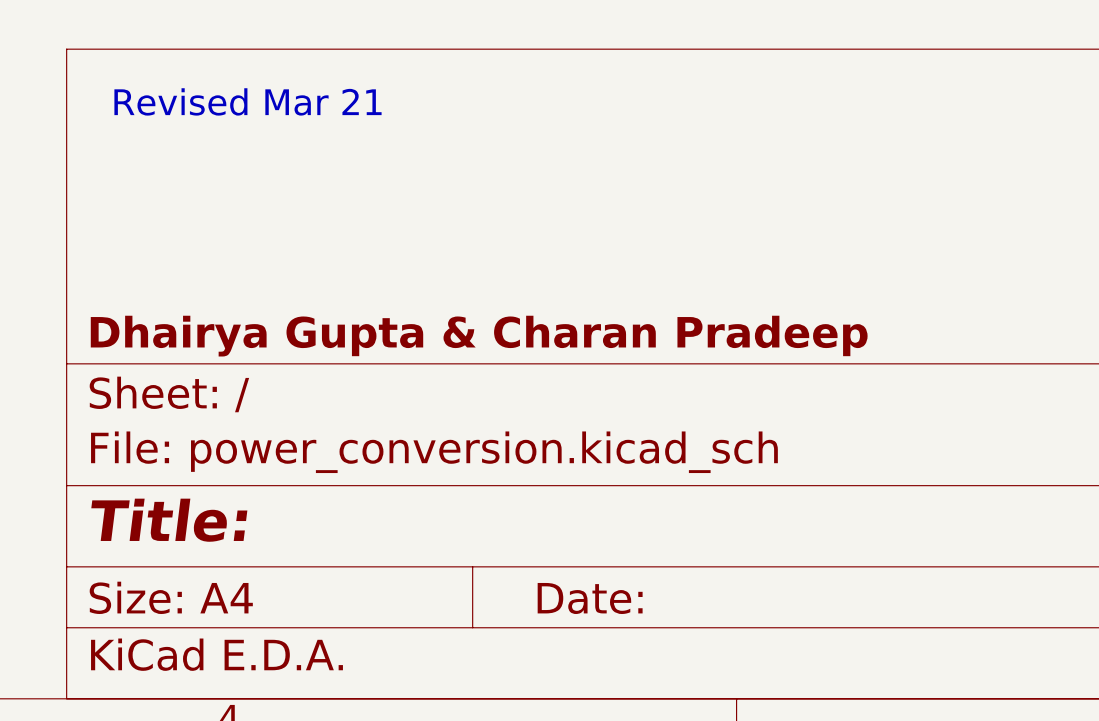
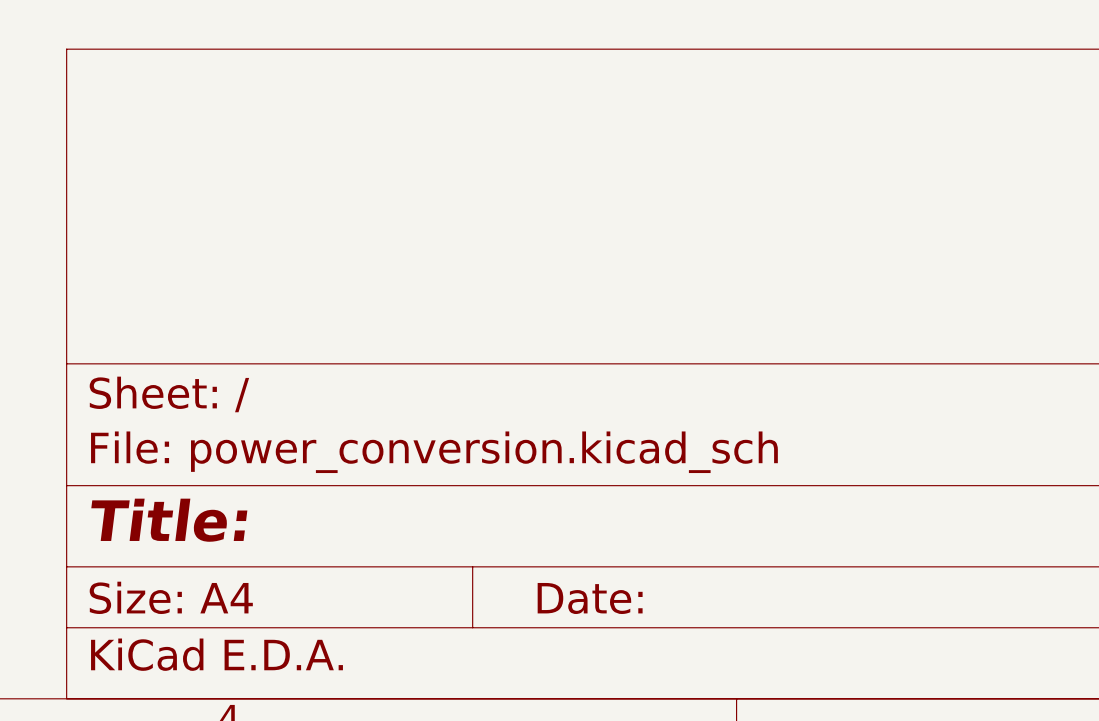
text: Revised Mar 21 (247, 101) -> none
title block: Dhairya Gupta & Charan Pradeep (479, 336) -> none

